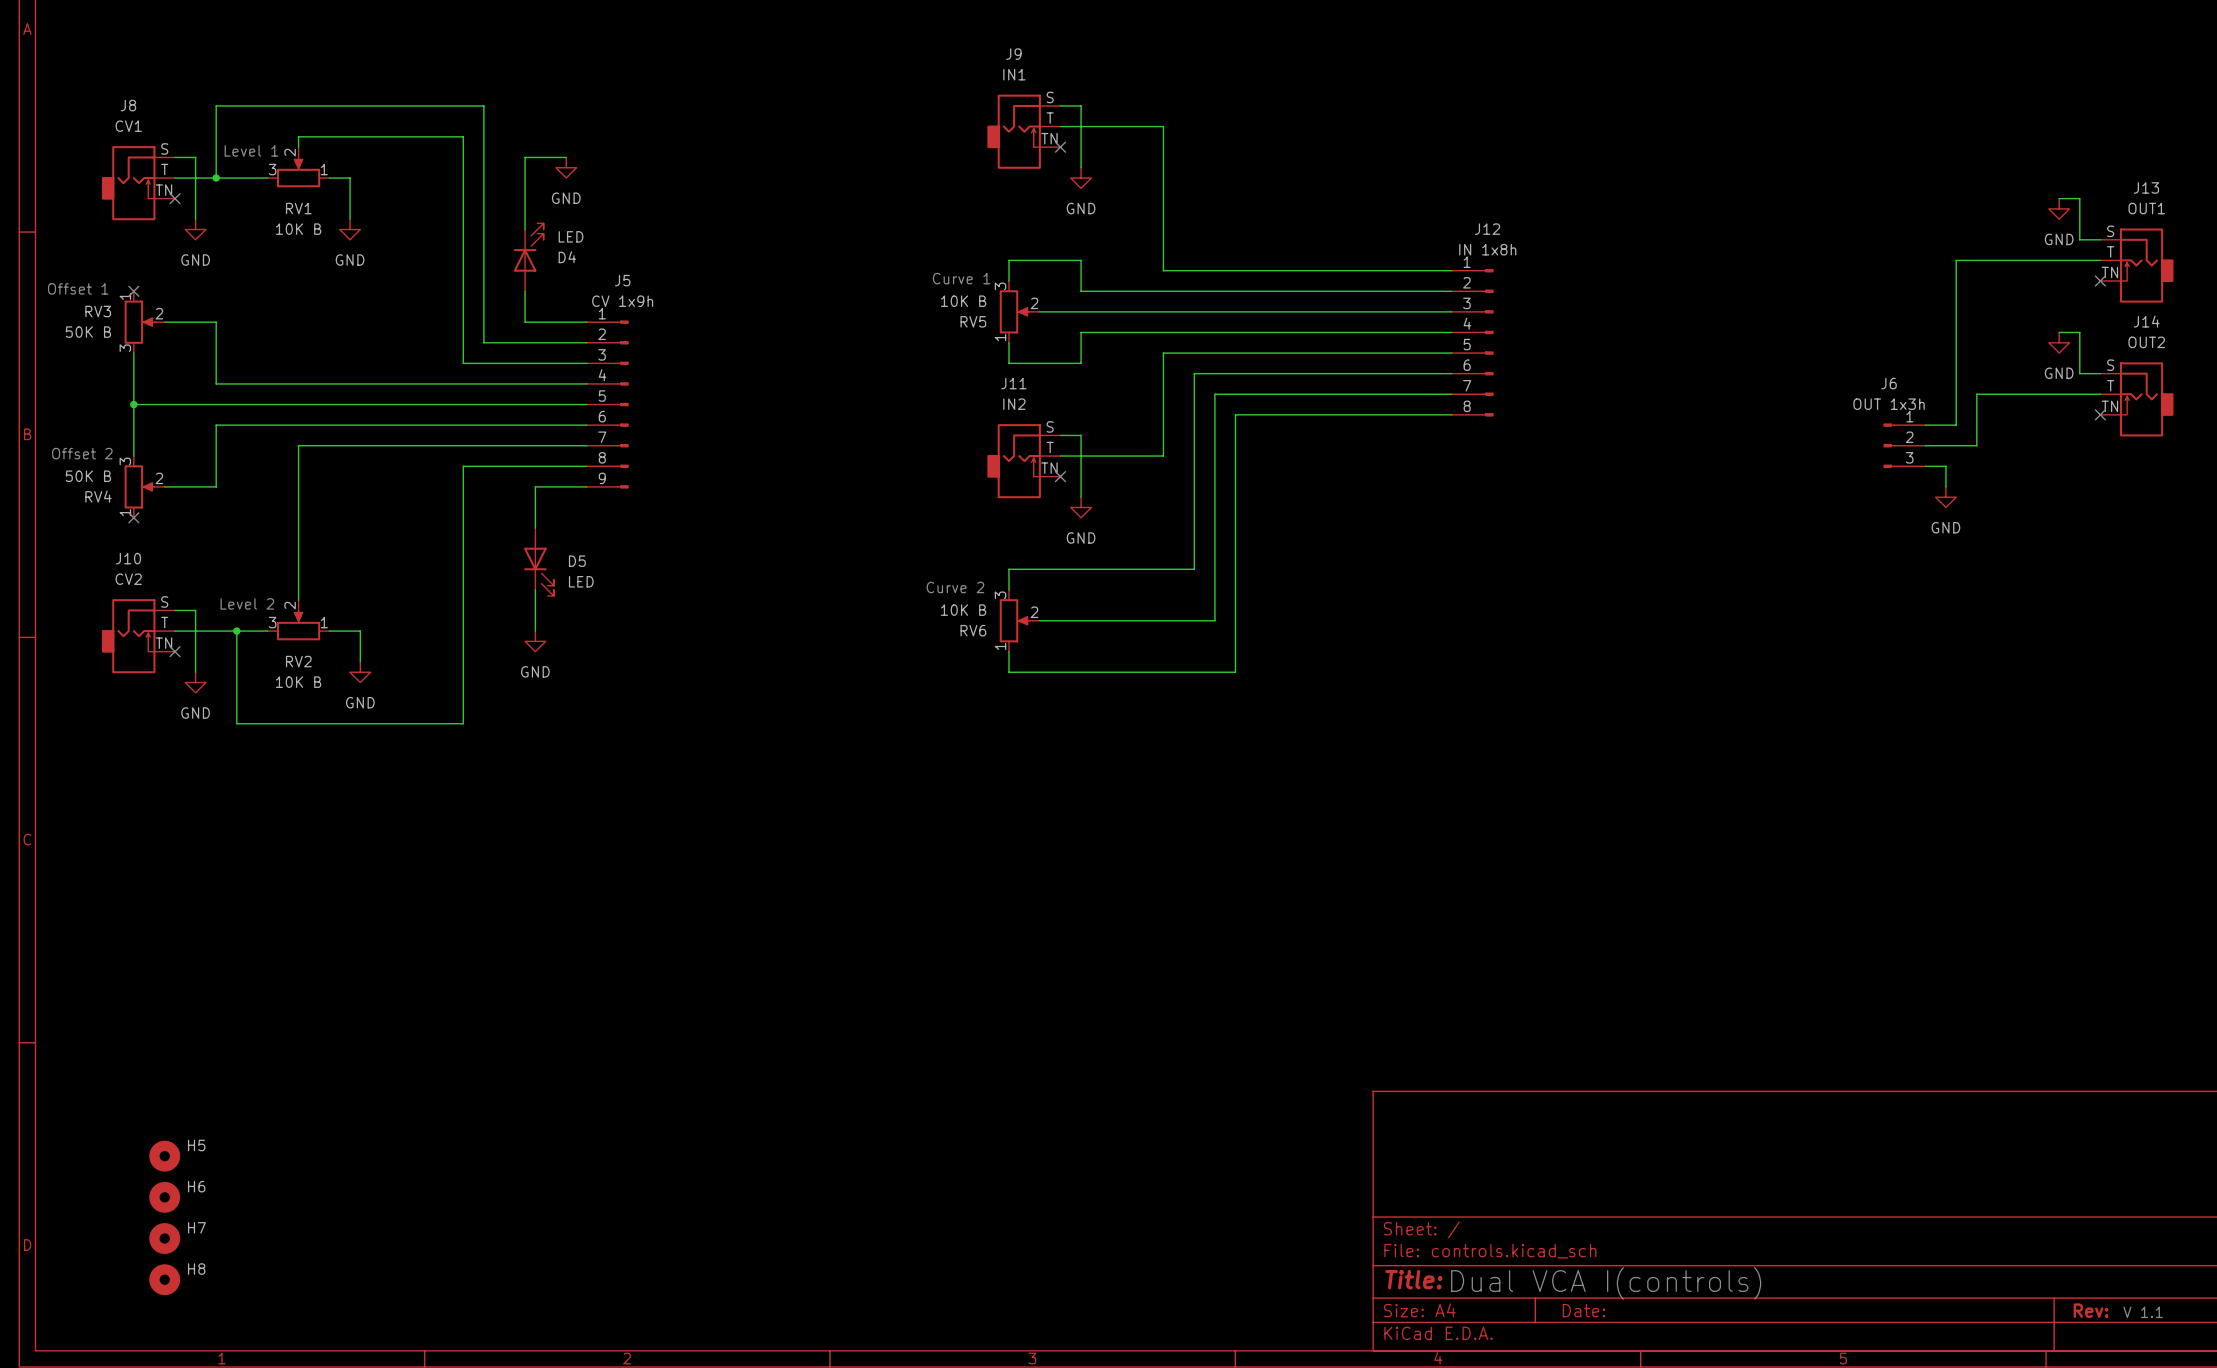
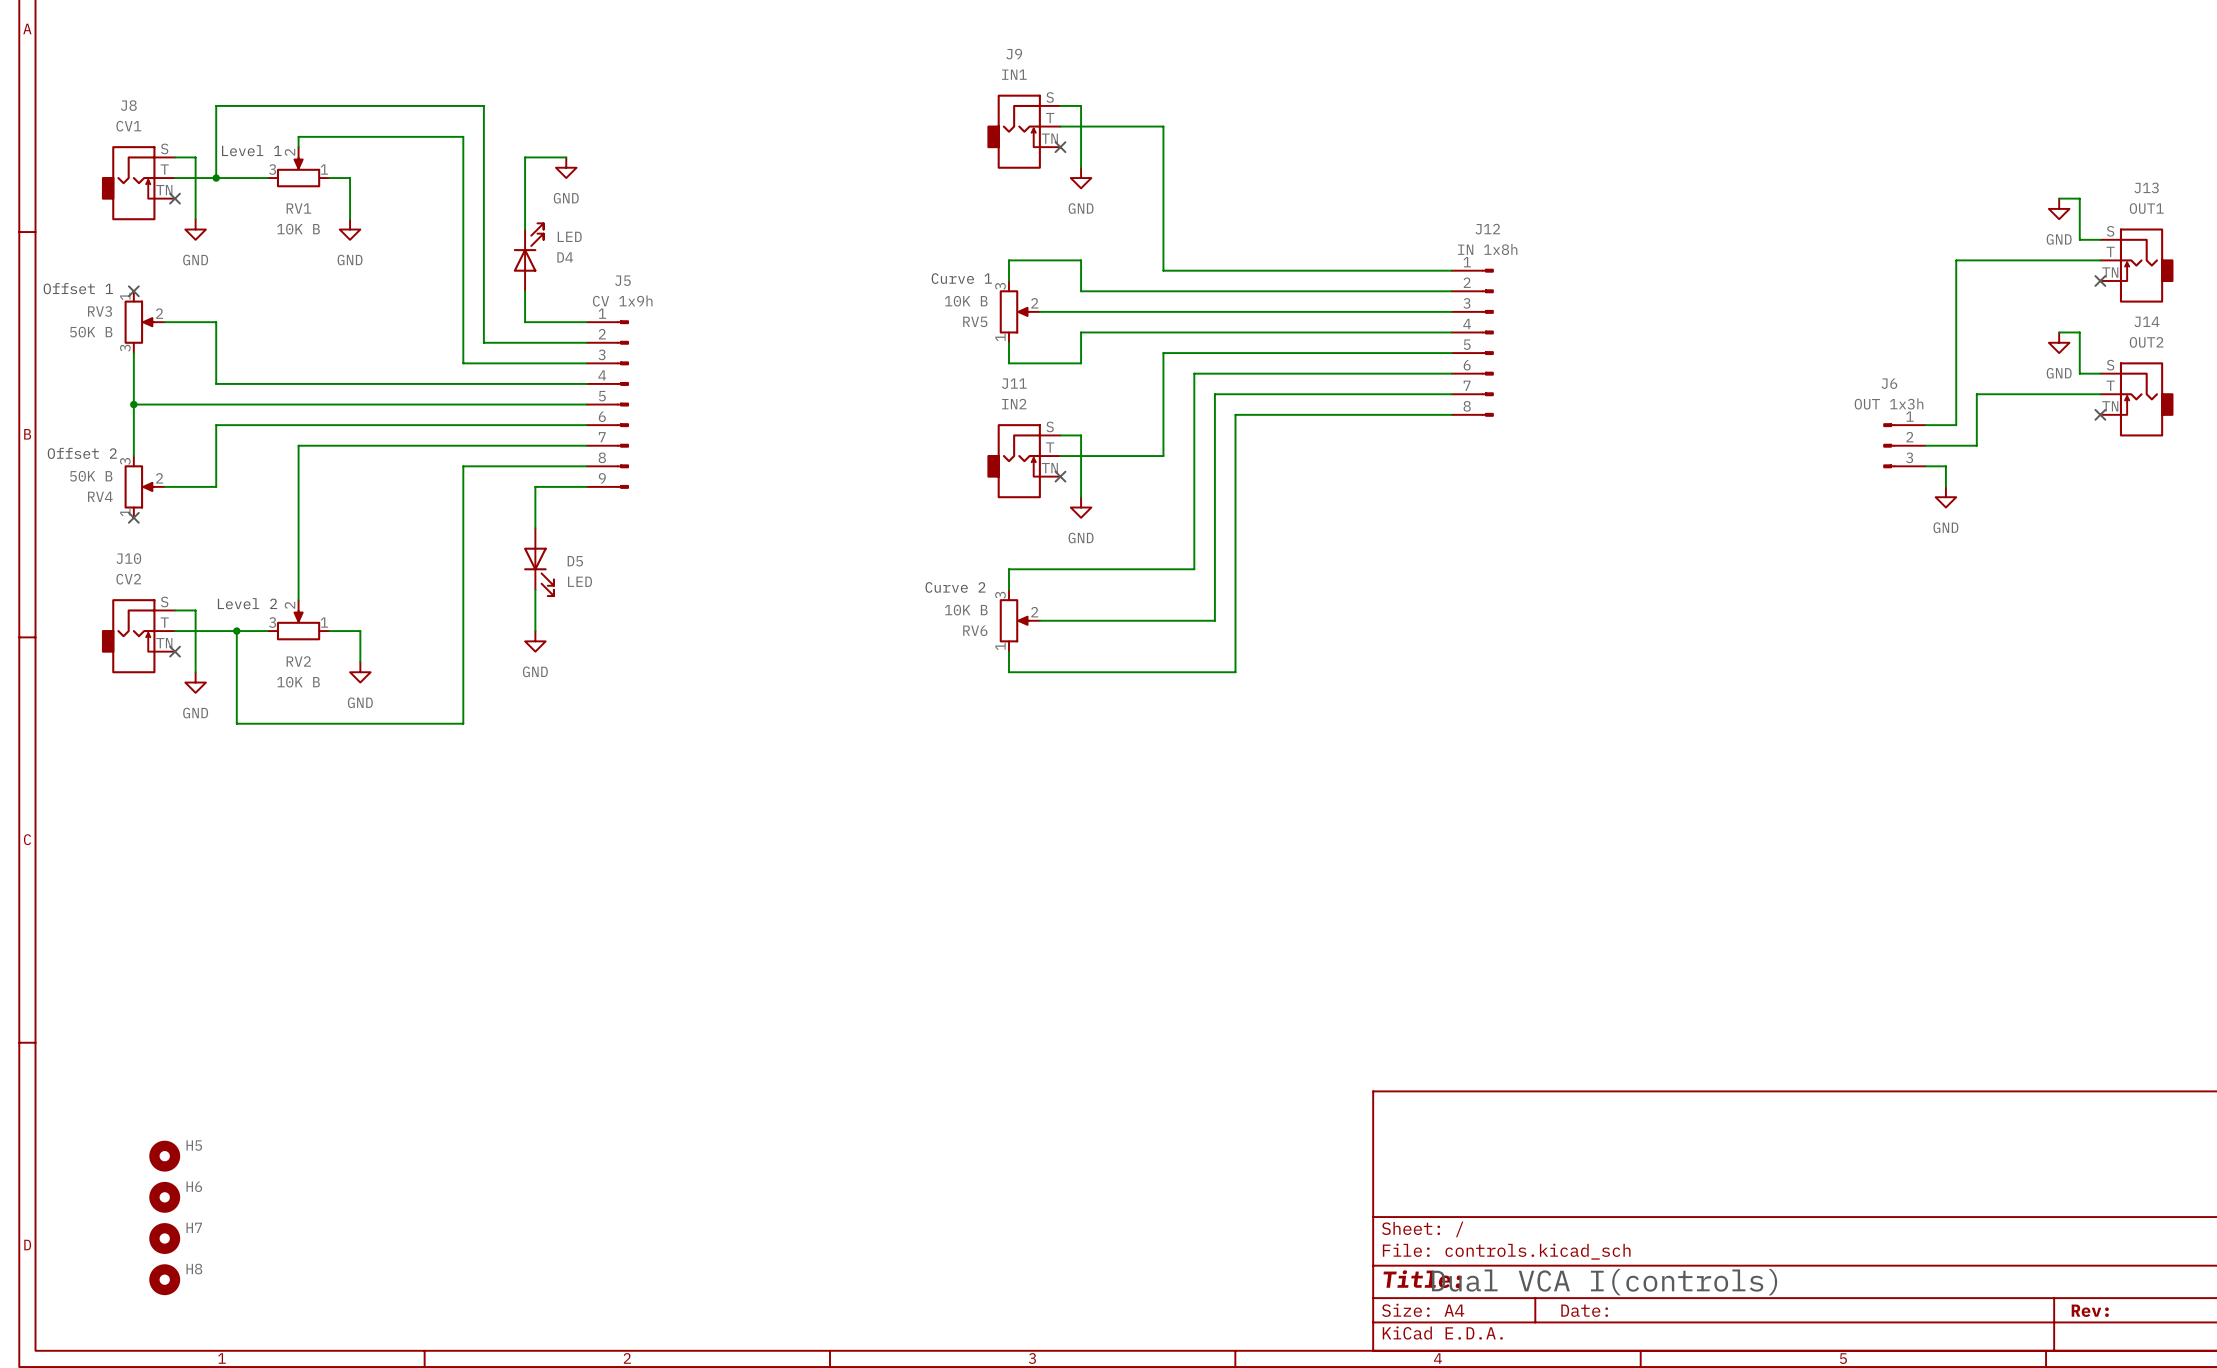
text: V 1.1 (2143, 1312) -> none

